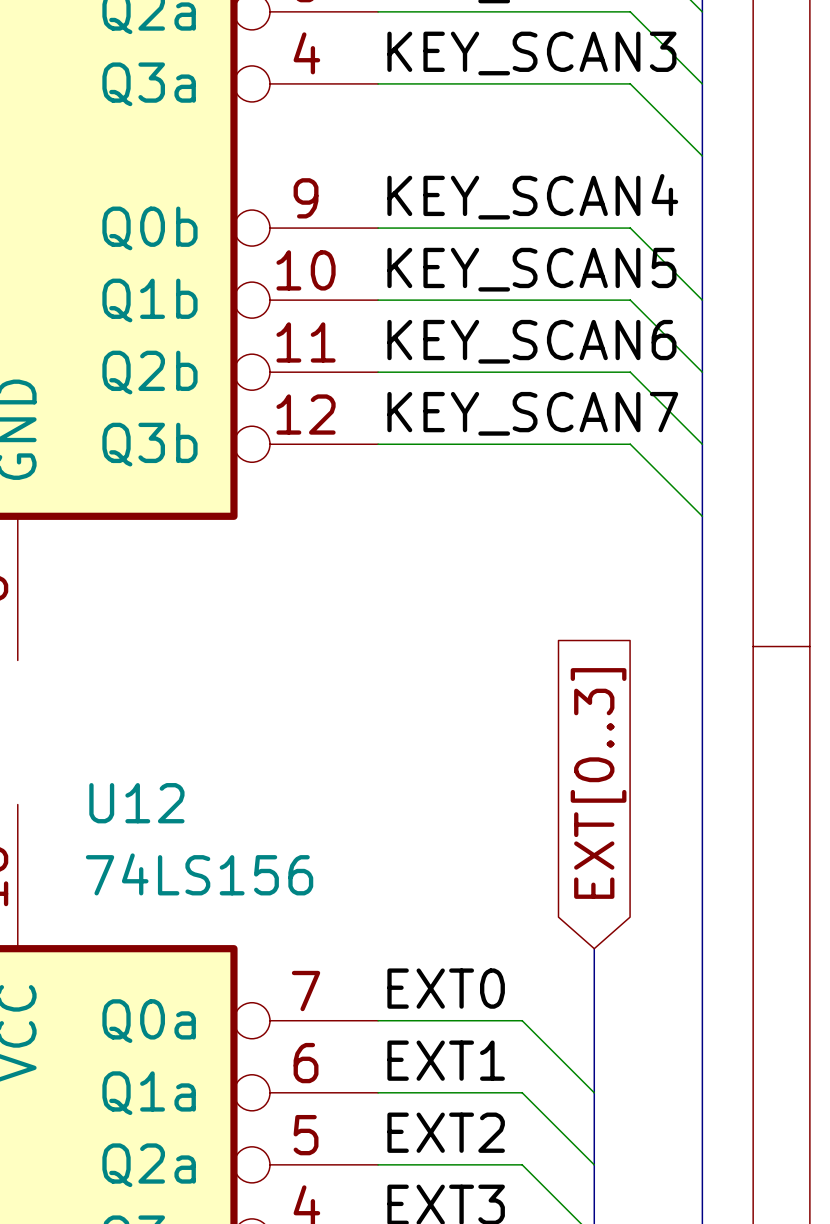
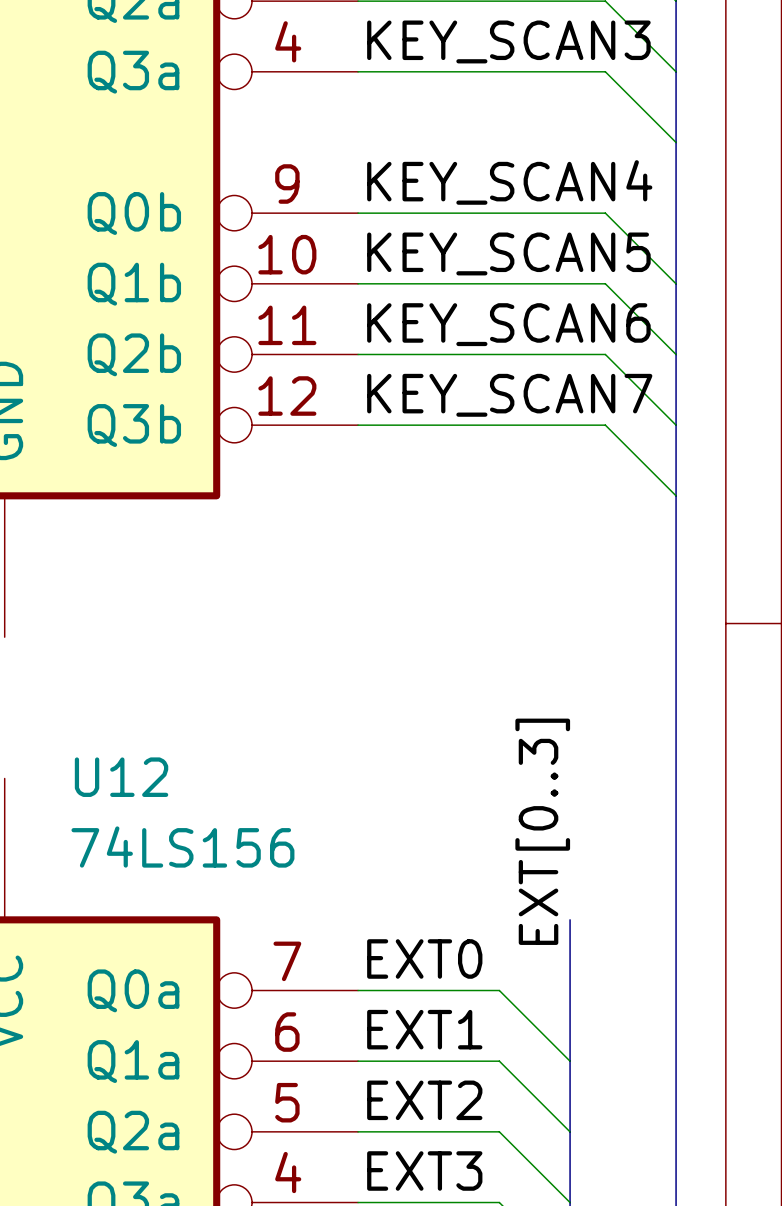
global label: EXT[0..3] (598, 783) -> none
label: none -> EXT[0..3] (542, 831)

